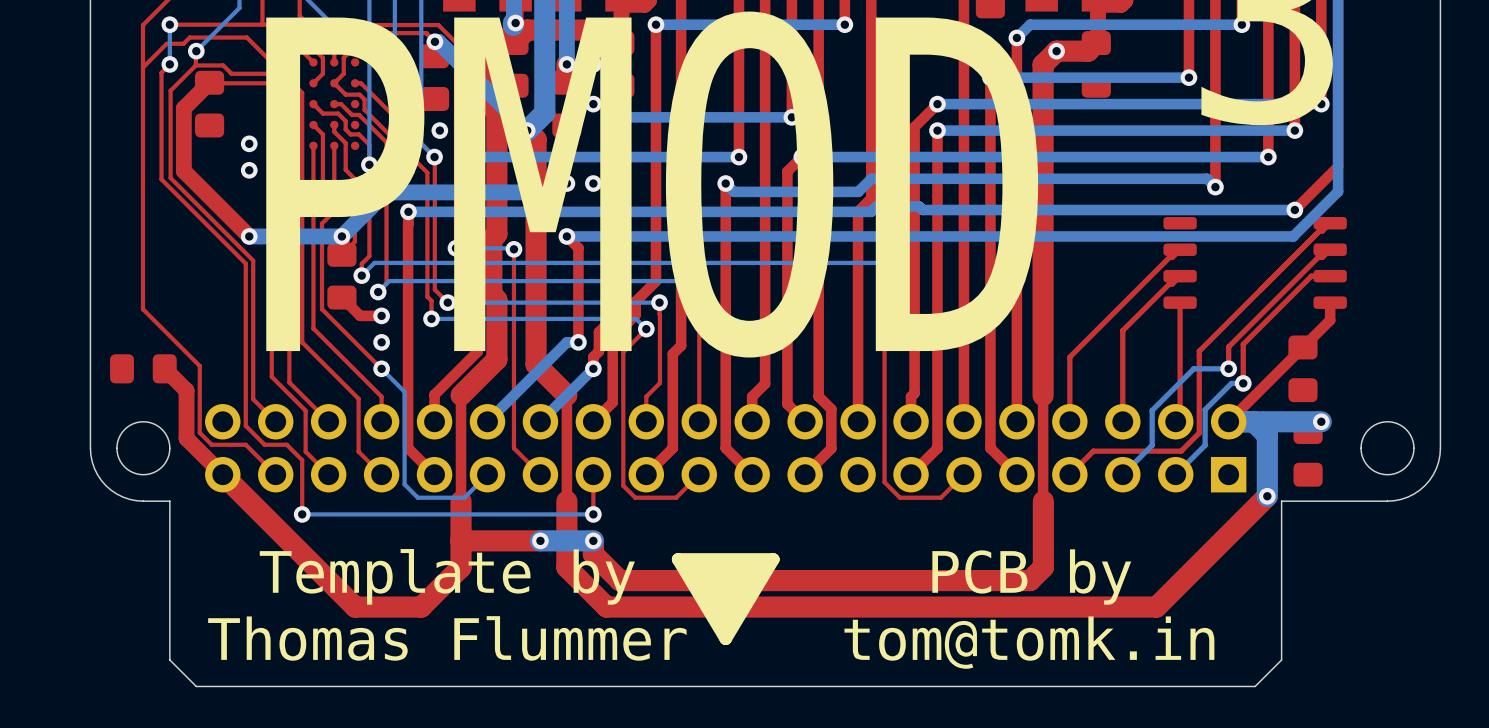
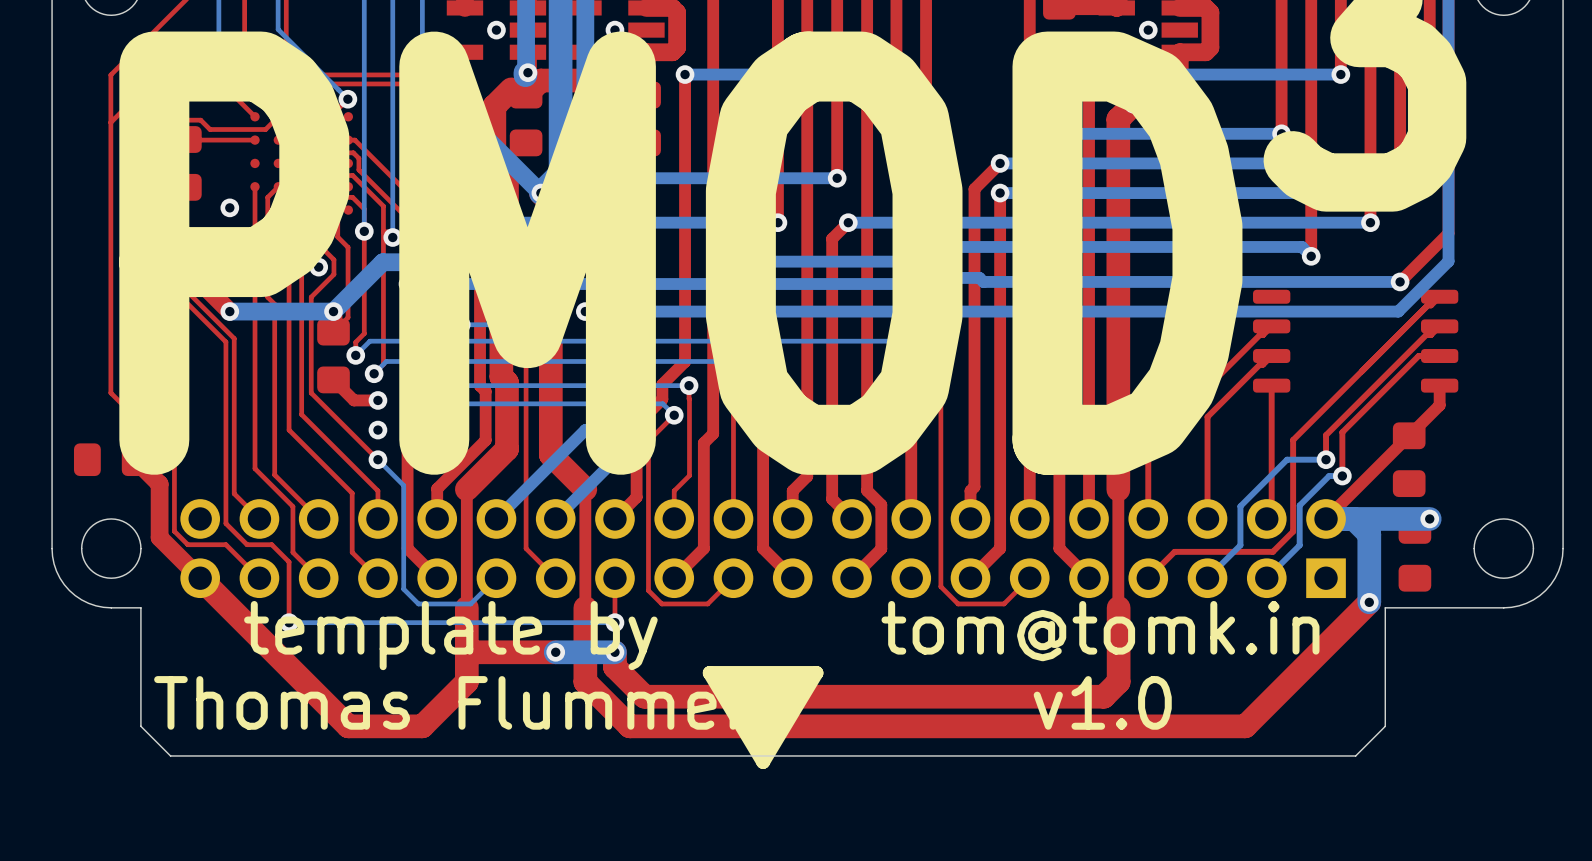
text: none -> template by (450, 635)
text: Template by (447, 576) -> Thomas Flummer (452, 702)
text: PCB by (1031, 577) -> v1.0 (1102, 702)
board edge: (1281, 607) (1281, 659) (1255, 686) (196, 686) (169, 659) (169, 607) -> (1385, 726) (1355, 755) (170, 755) (140, 726)
text: Thomas Flummer (447, 638) -> none
text position: tom@tomk.in (1029, 642) -> tom@tomk.in (1100, 631)

